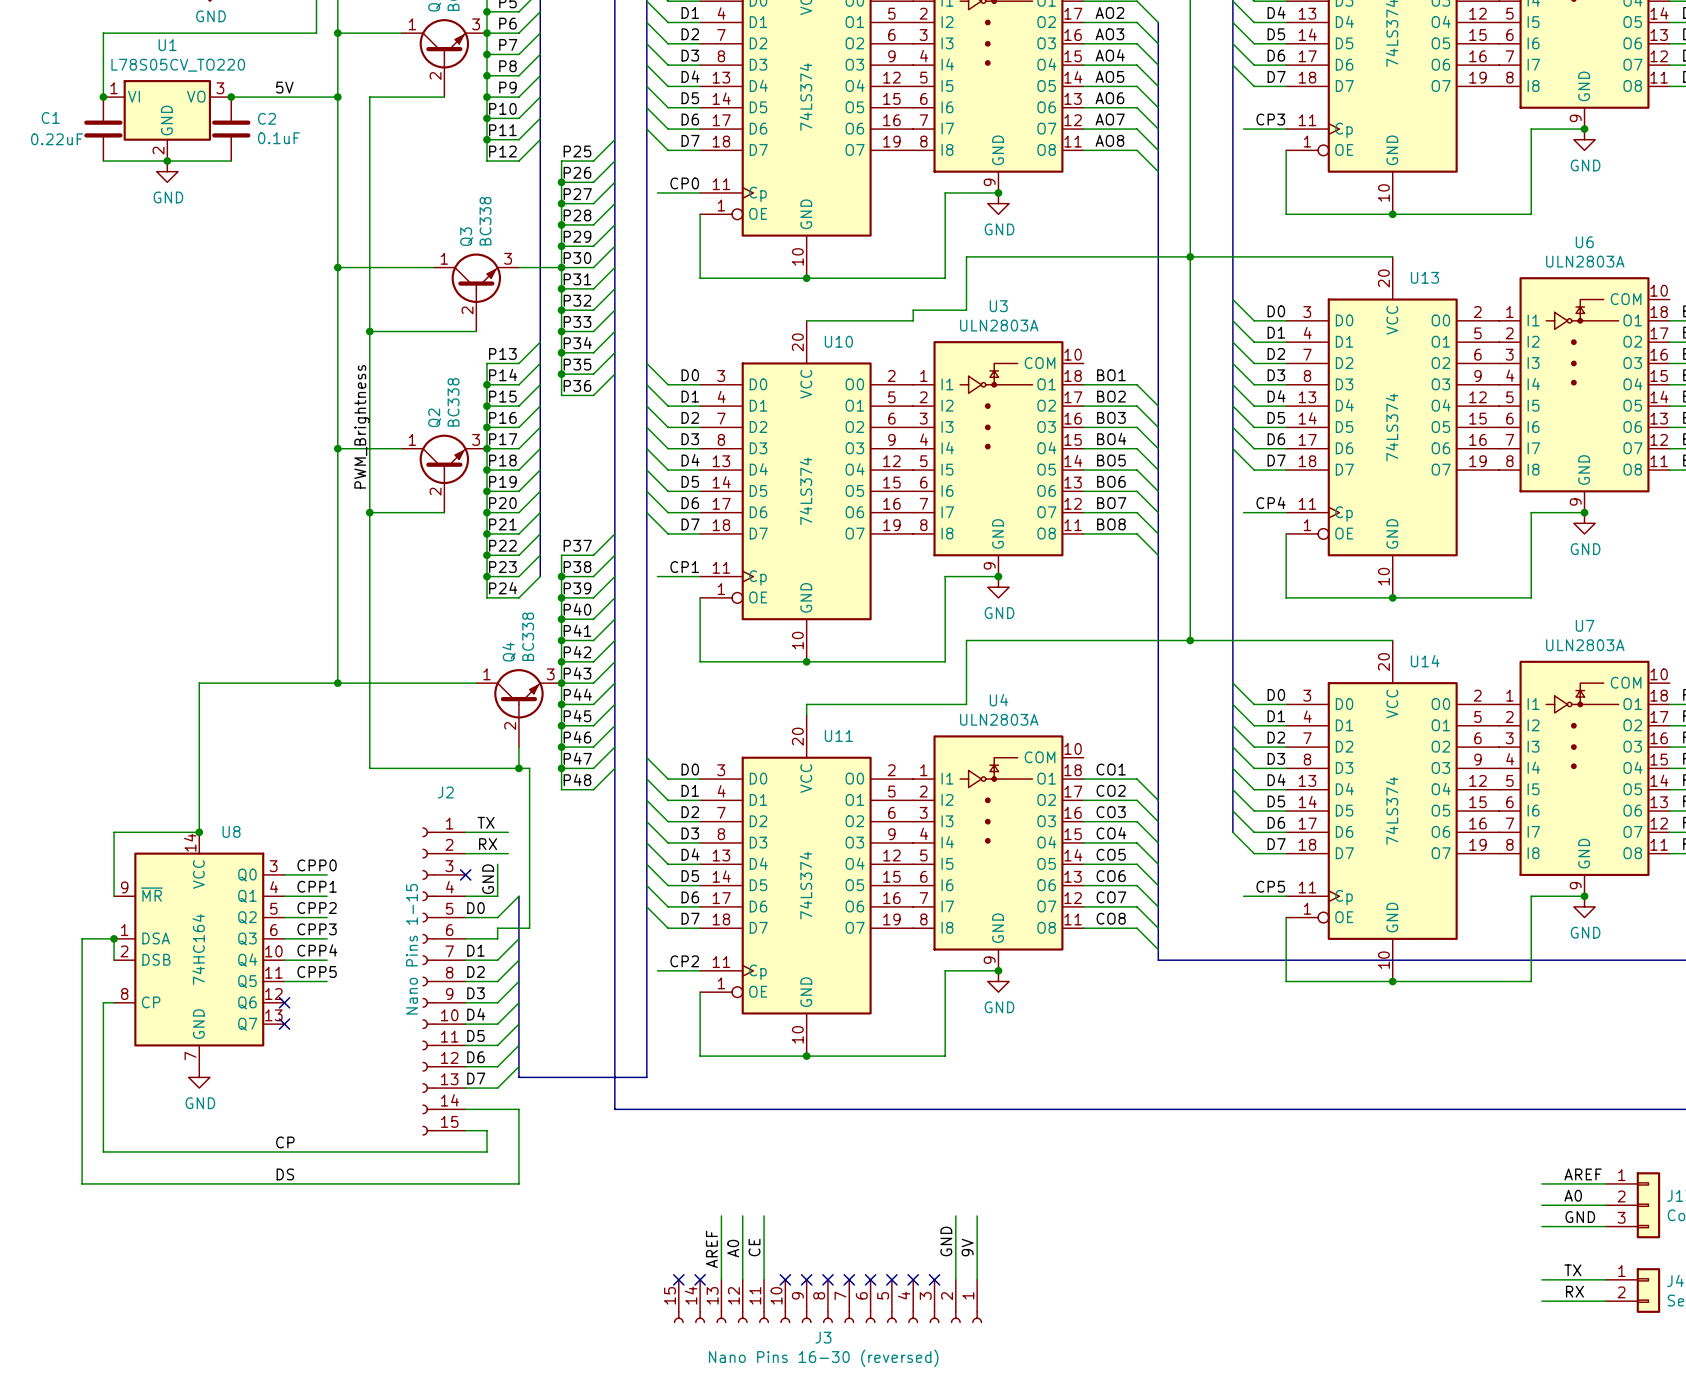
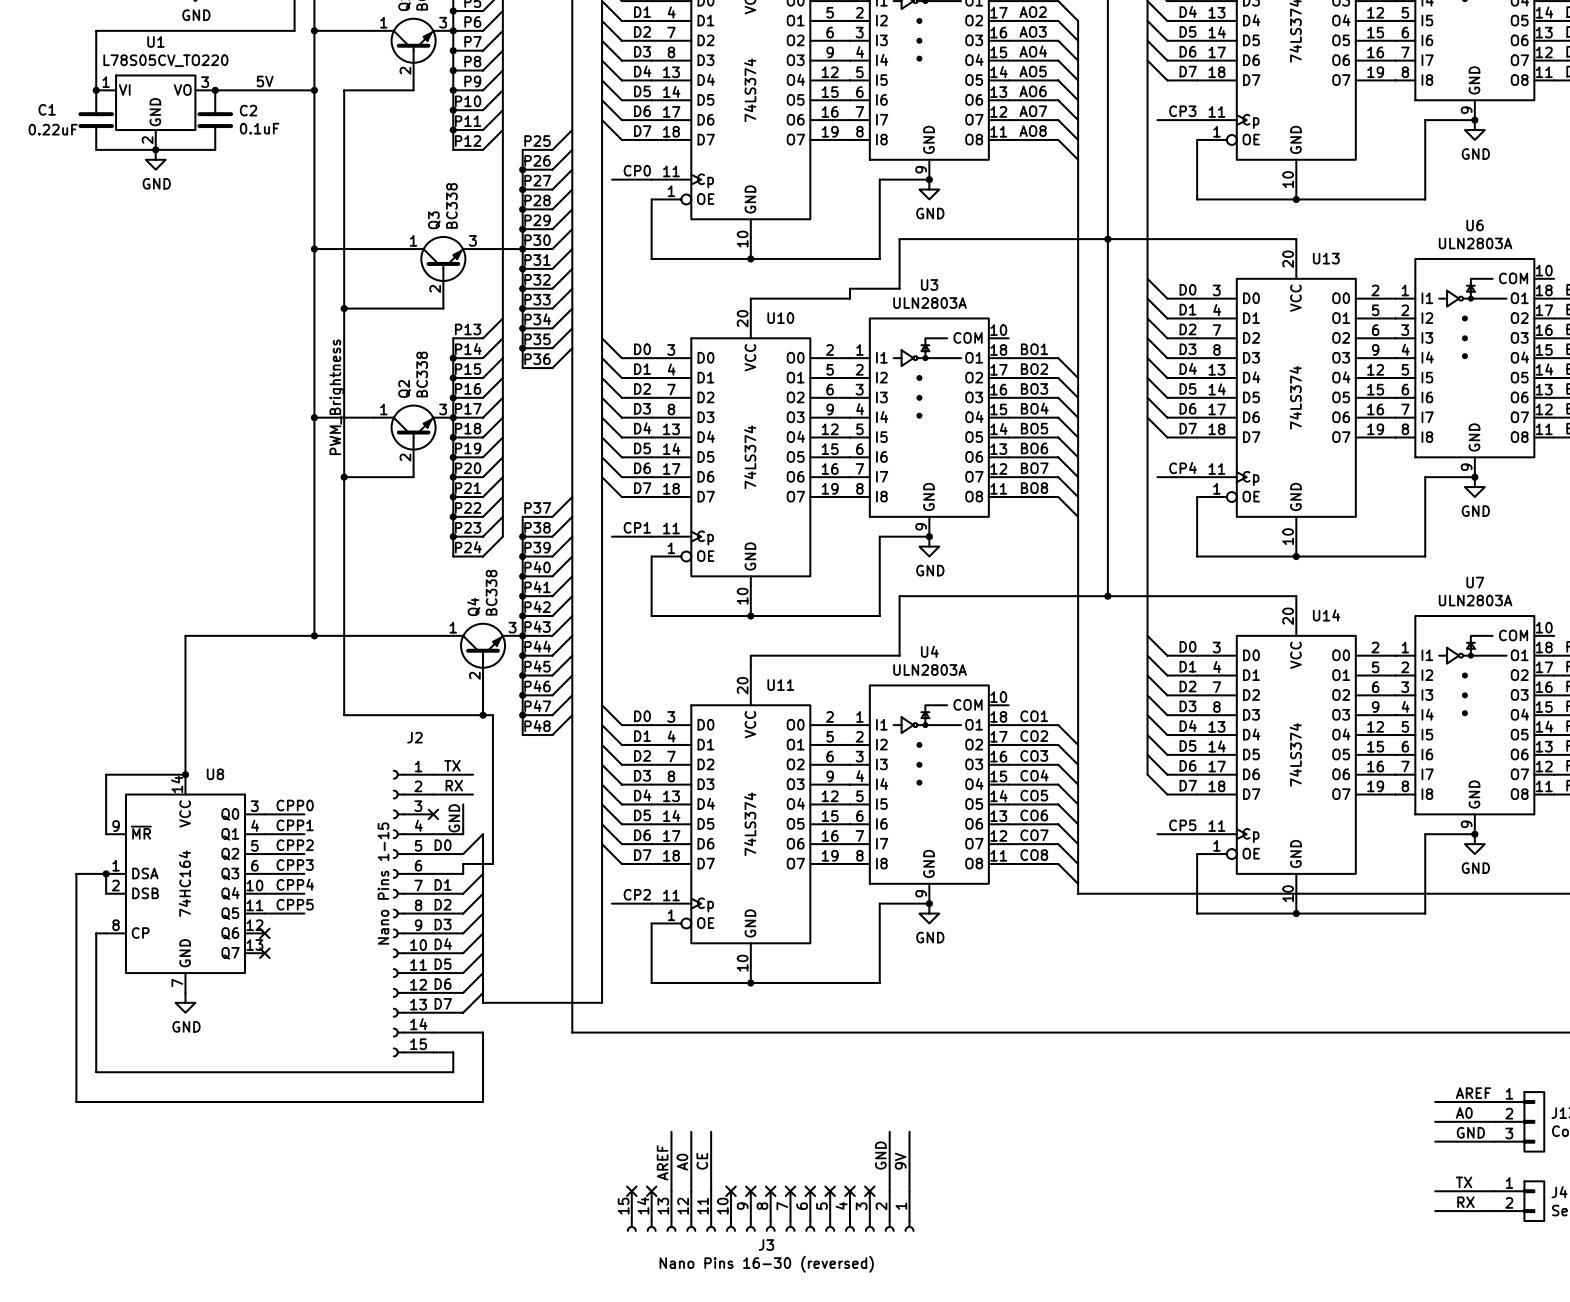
label: CP (285, 1142) -> none
label: DS (285, 1174) -> none

